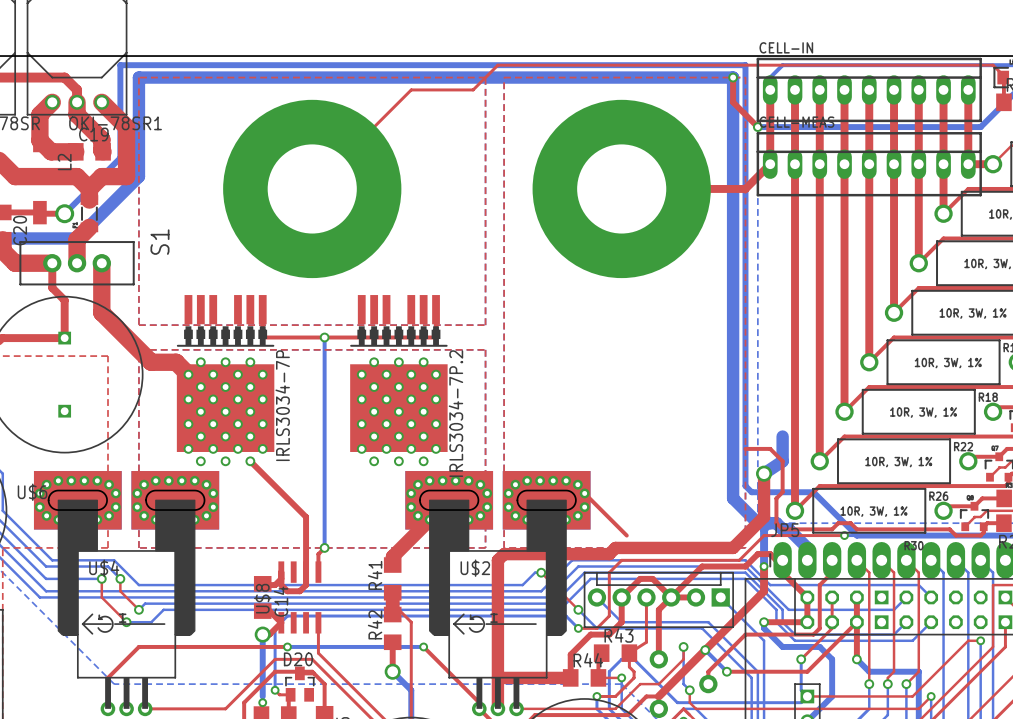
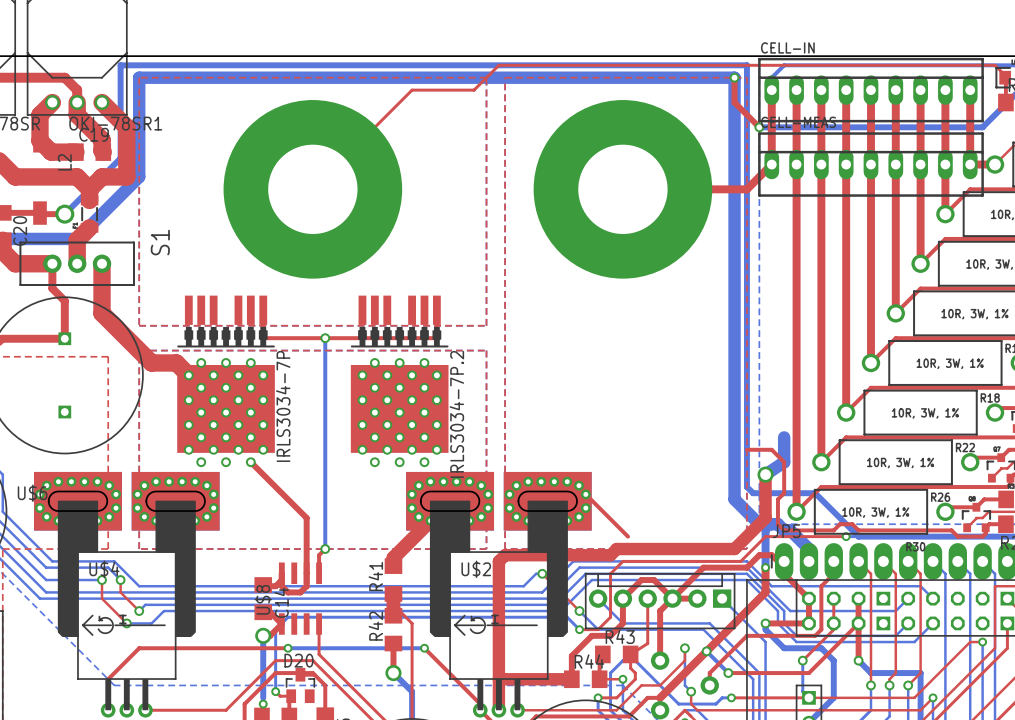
top track: none -> (731, 697) (808, 697)
via: none -> (731, 697)
bottom track: (807, 696) (801, 702) (714, 702) -> (731, 697) (722, 697) (715, 704)

